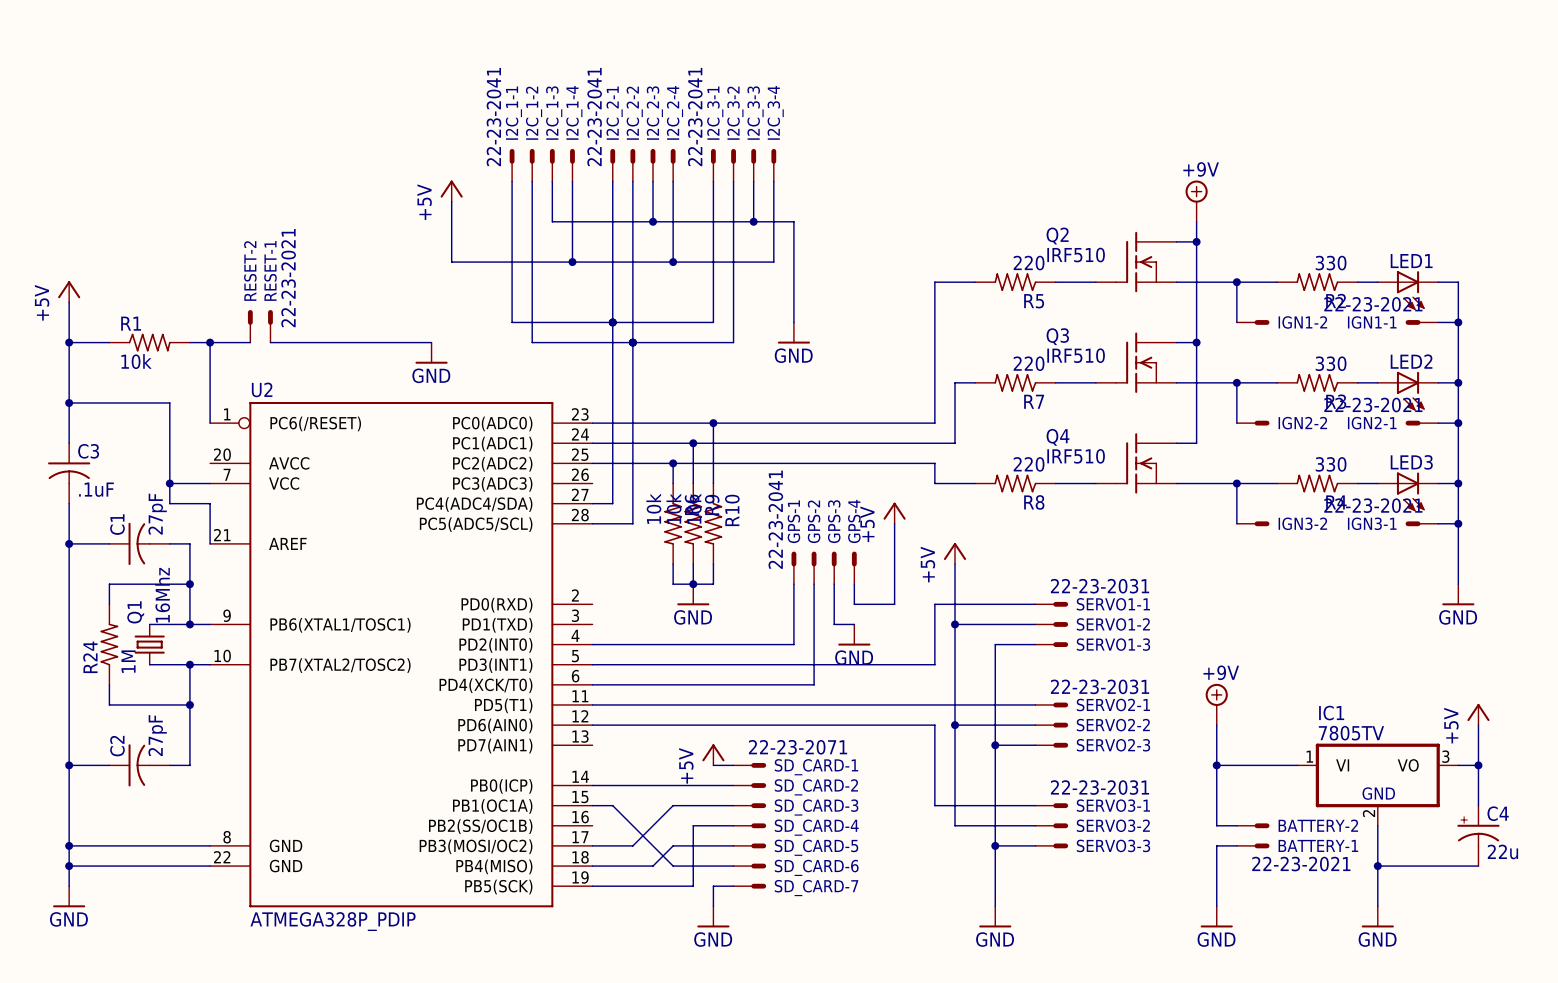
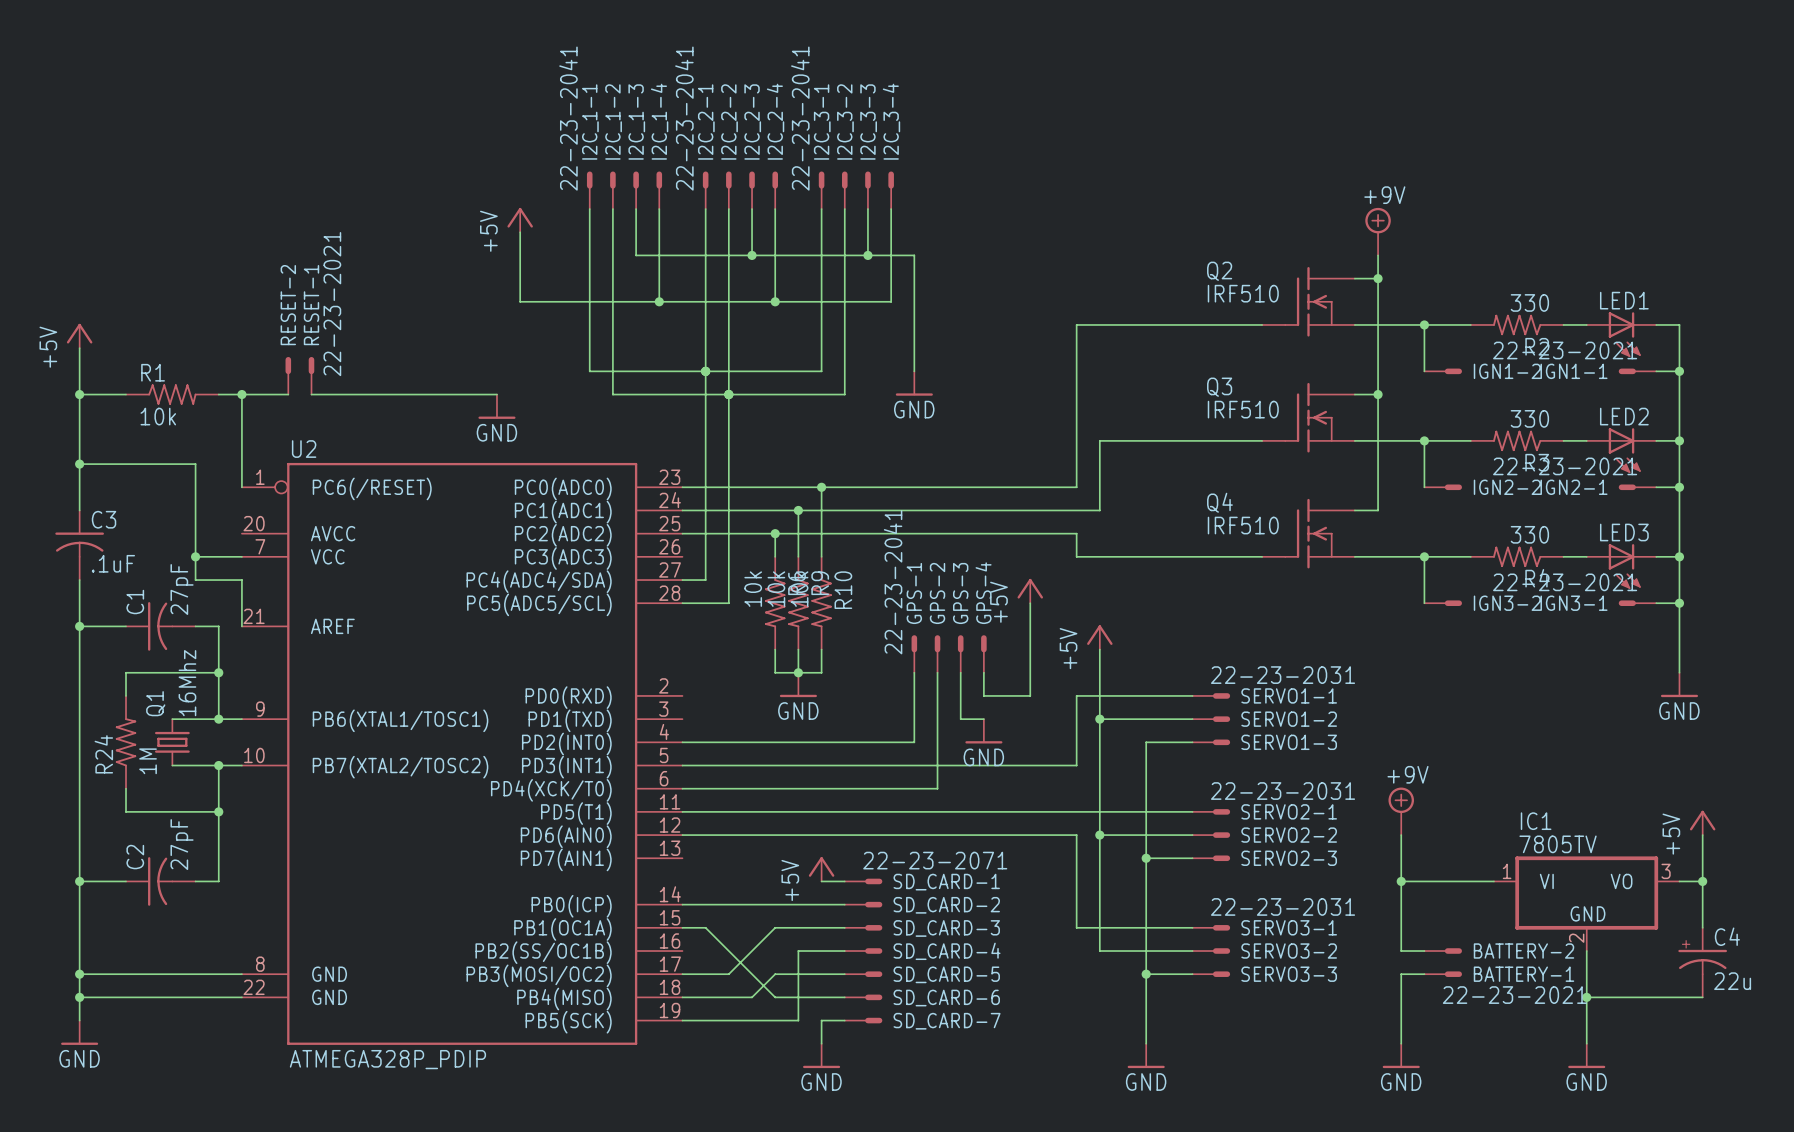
R5: 220 (1015, 282) -> none
R7: 220 (1015, 382) -> none
R8: 220 (1015, 483) -> none

